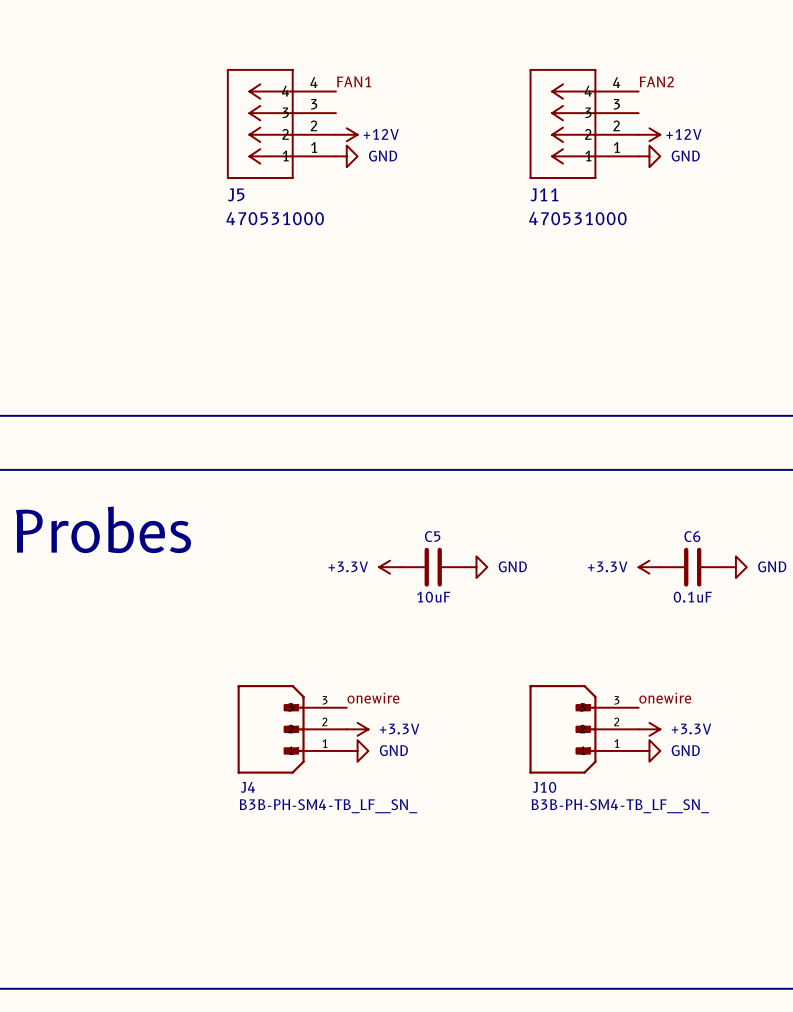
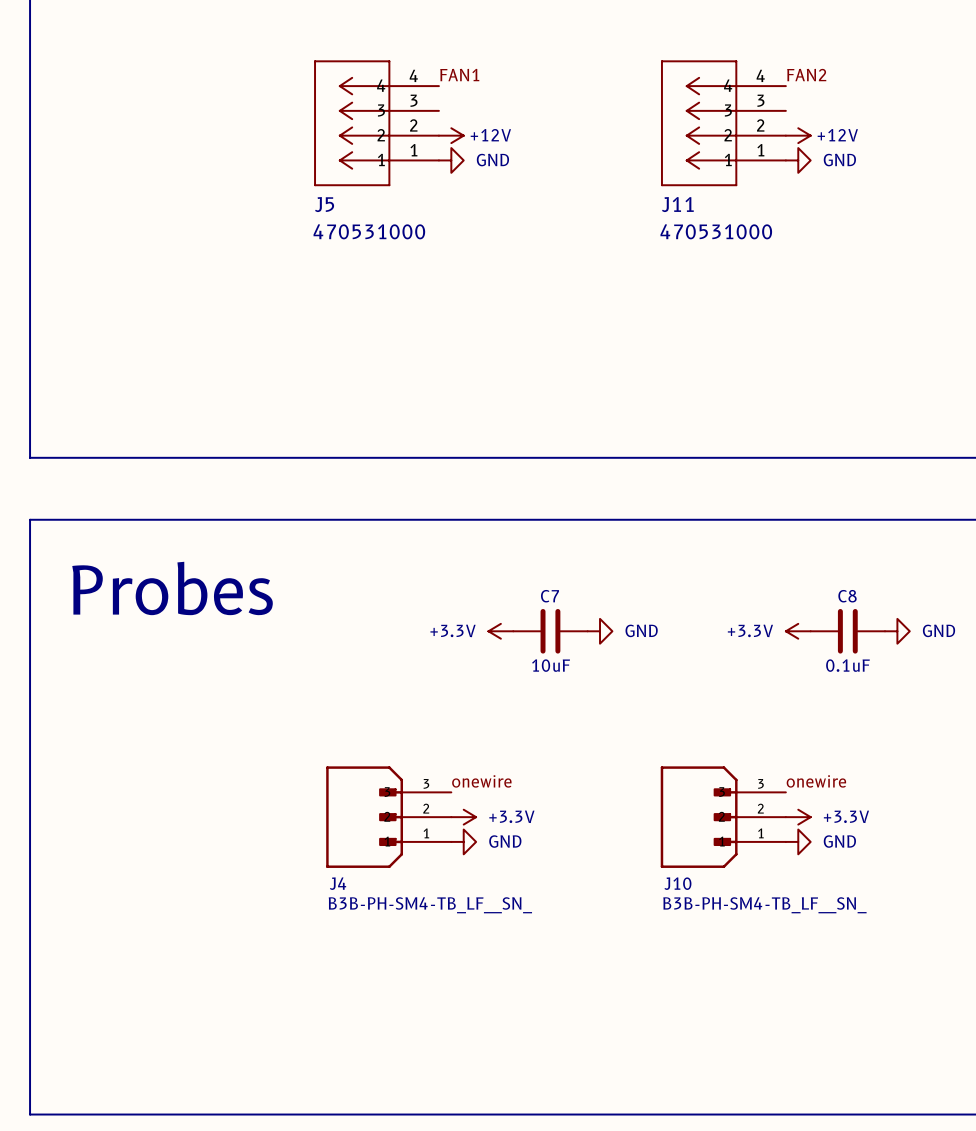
C5 name: C5 (432, 536) -> C7 (550, 596)
C6 name: C6 (692, 536) -> C8 (847, 596)

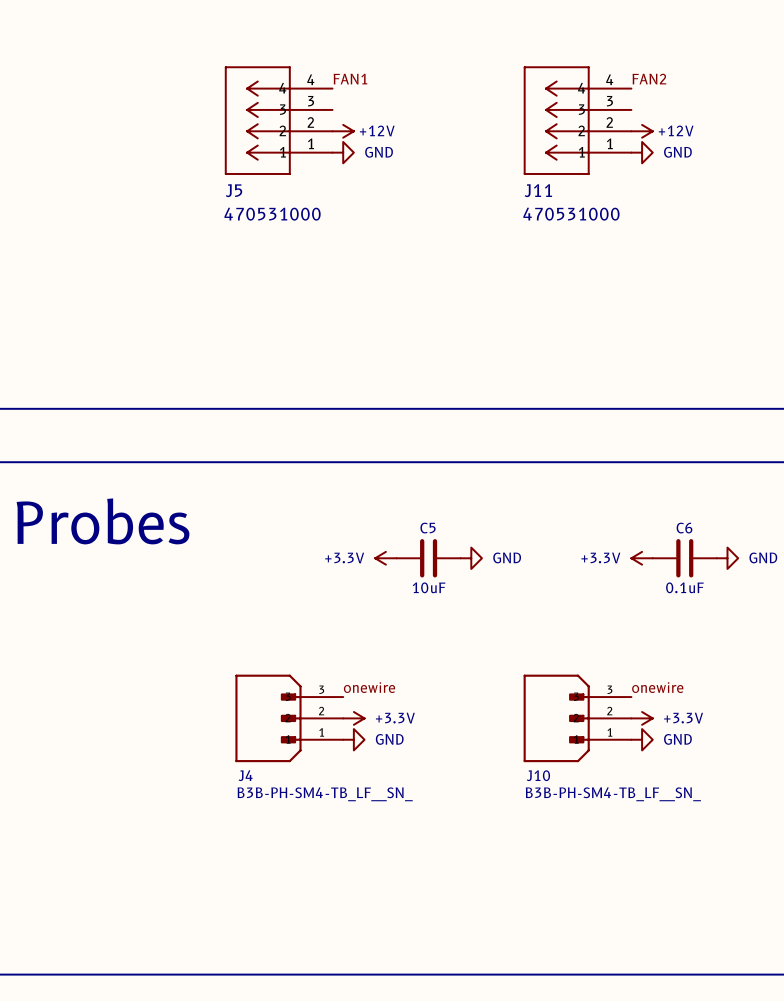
C7 name: C7 (550, 596) -> C5 (428, 528)
C8 name: C8 (847, 596) -> C6 (684, 528)

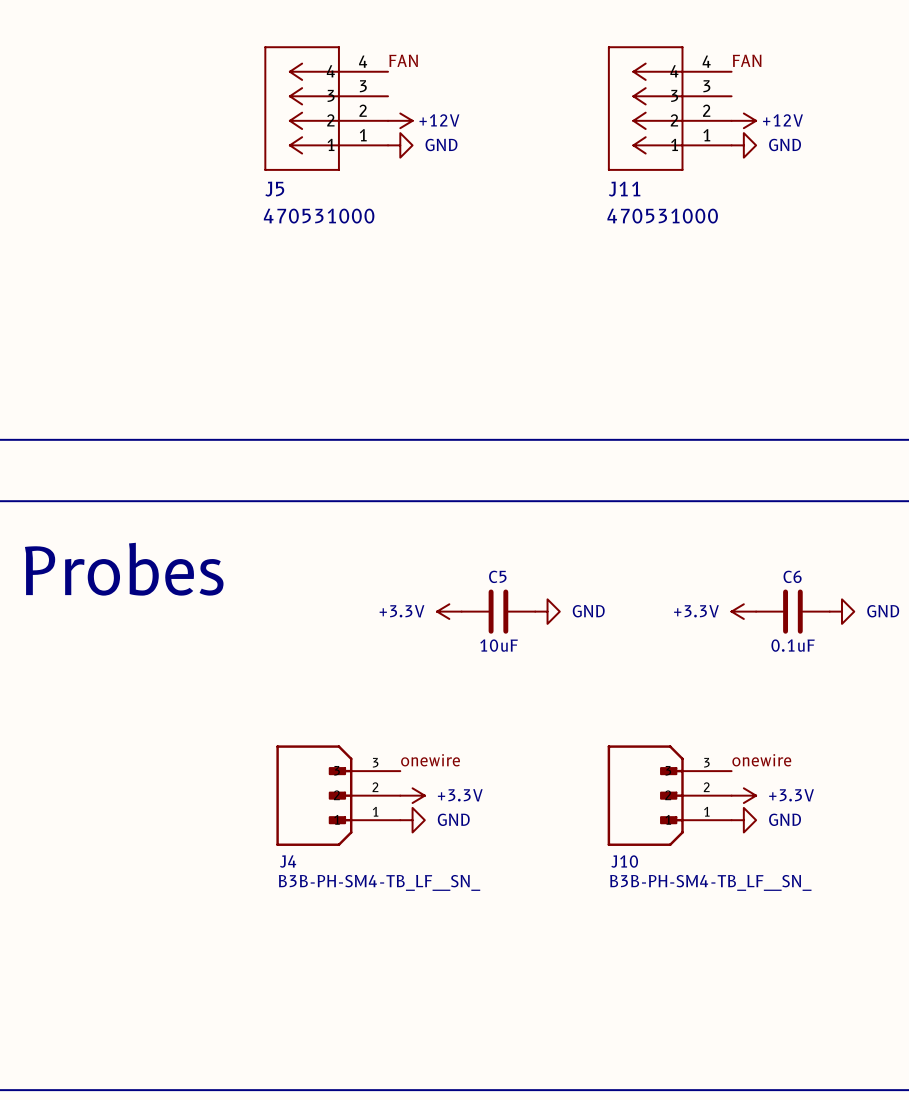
label: FAN1 (350, 79) -> FAN (403, 60)
label: FAN2 (649, 79) -> FAN (747, 60)

